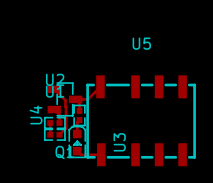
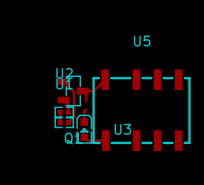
U4: (79, 115) -> none
U3 name rotation: 0° (119, 142) -> 90° clockwise (122, 129)

